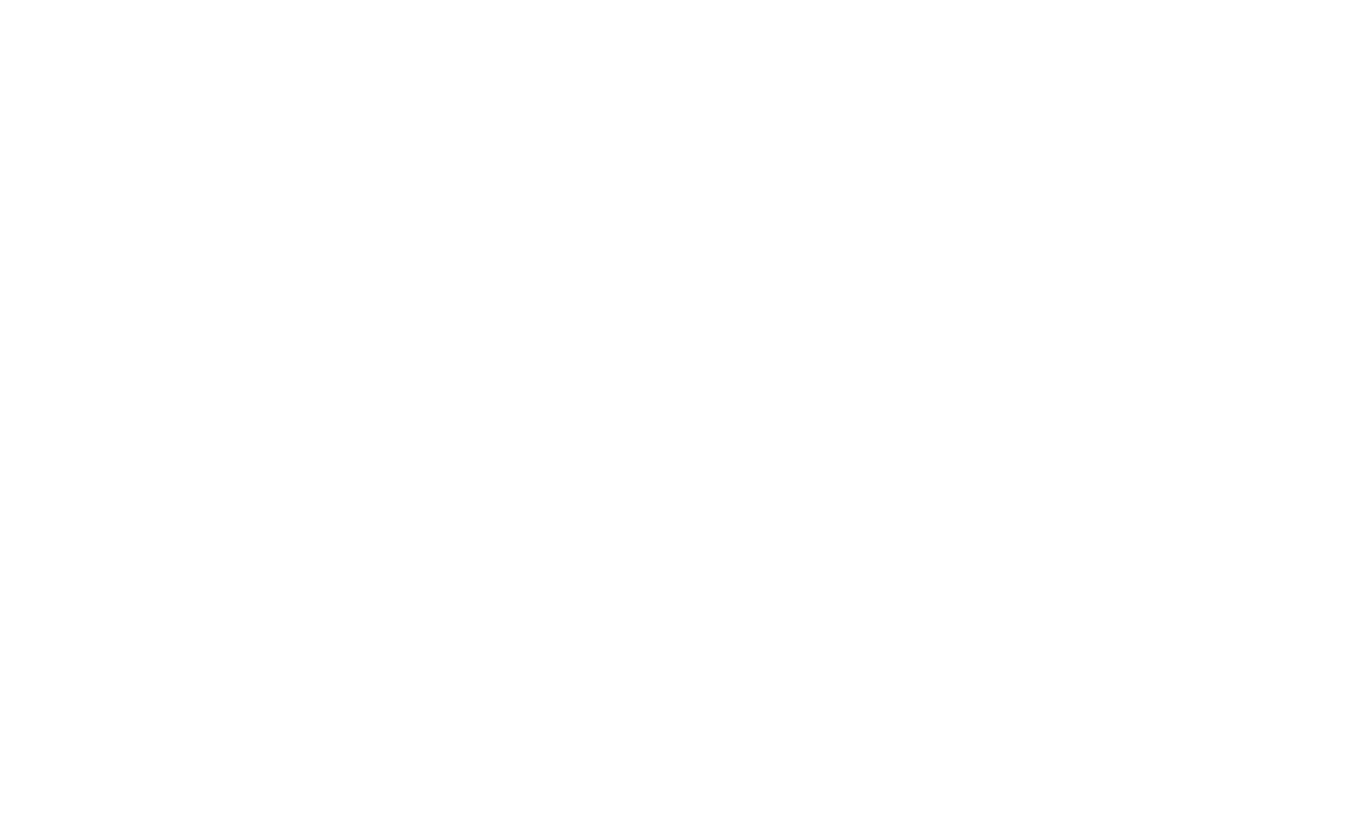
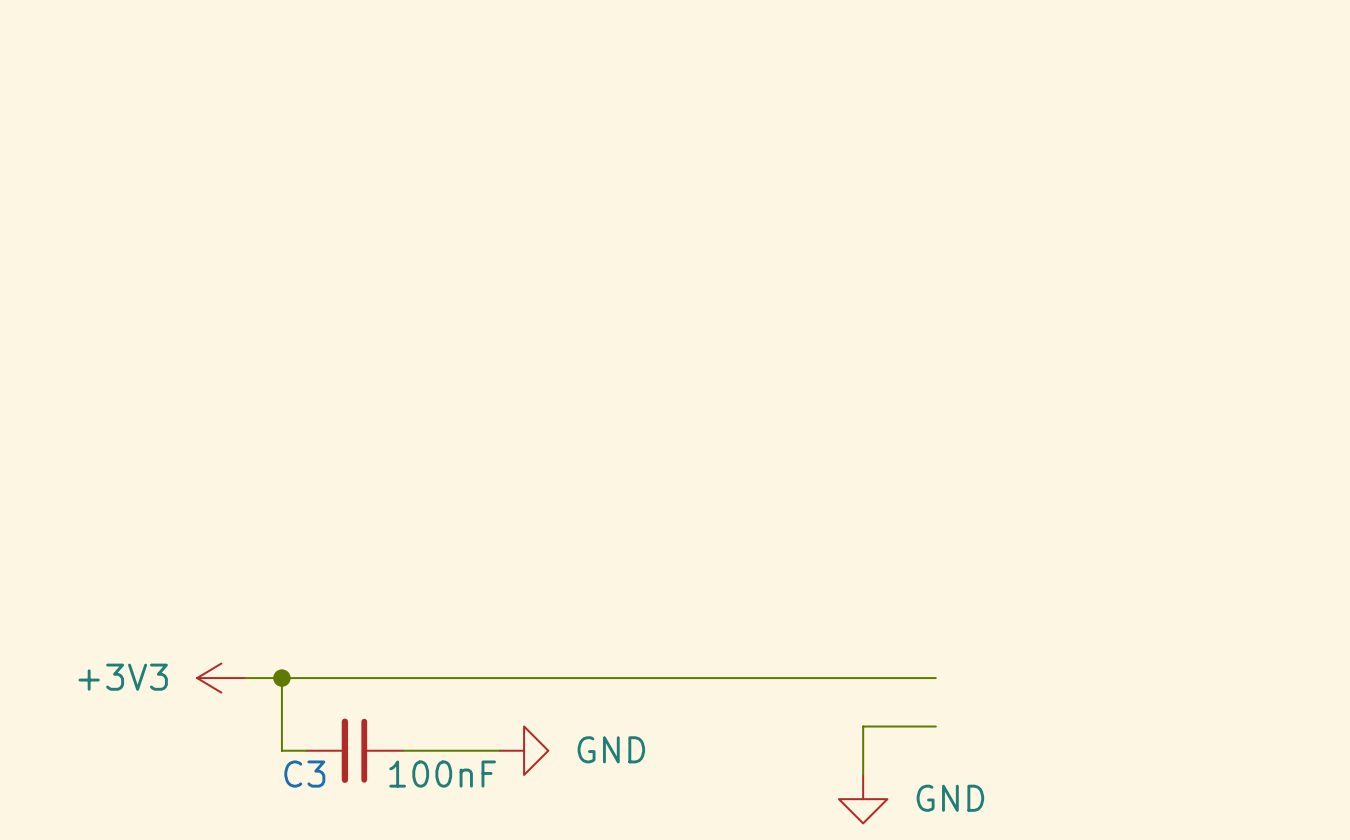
power symbol: none -> +3V3 (221, 678)
wire: none -> (245, 678) (935, 678)
wire: none -> (281, 678) (281, 750) (306, 750)
junction: none -> (281, 678)
wire: none -> (935, 726) (863, 726) (863, 774)
C3: none -> 100nF (354, 750)
wire: none -> (403, 750) (499, 750)
power symbol: none -> GND (524, 750)
power symbol: none -> GND (863, 799)

